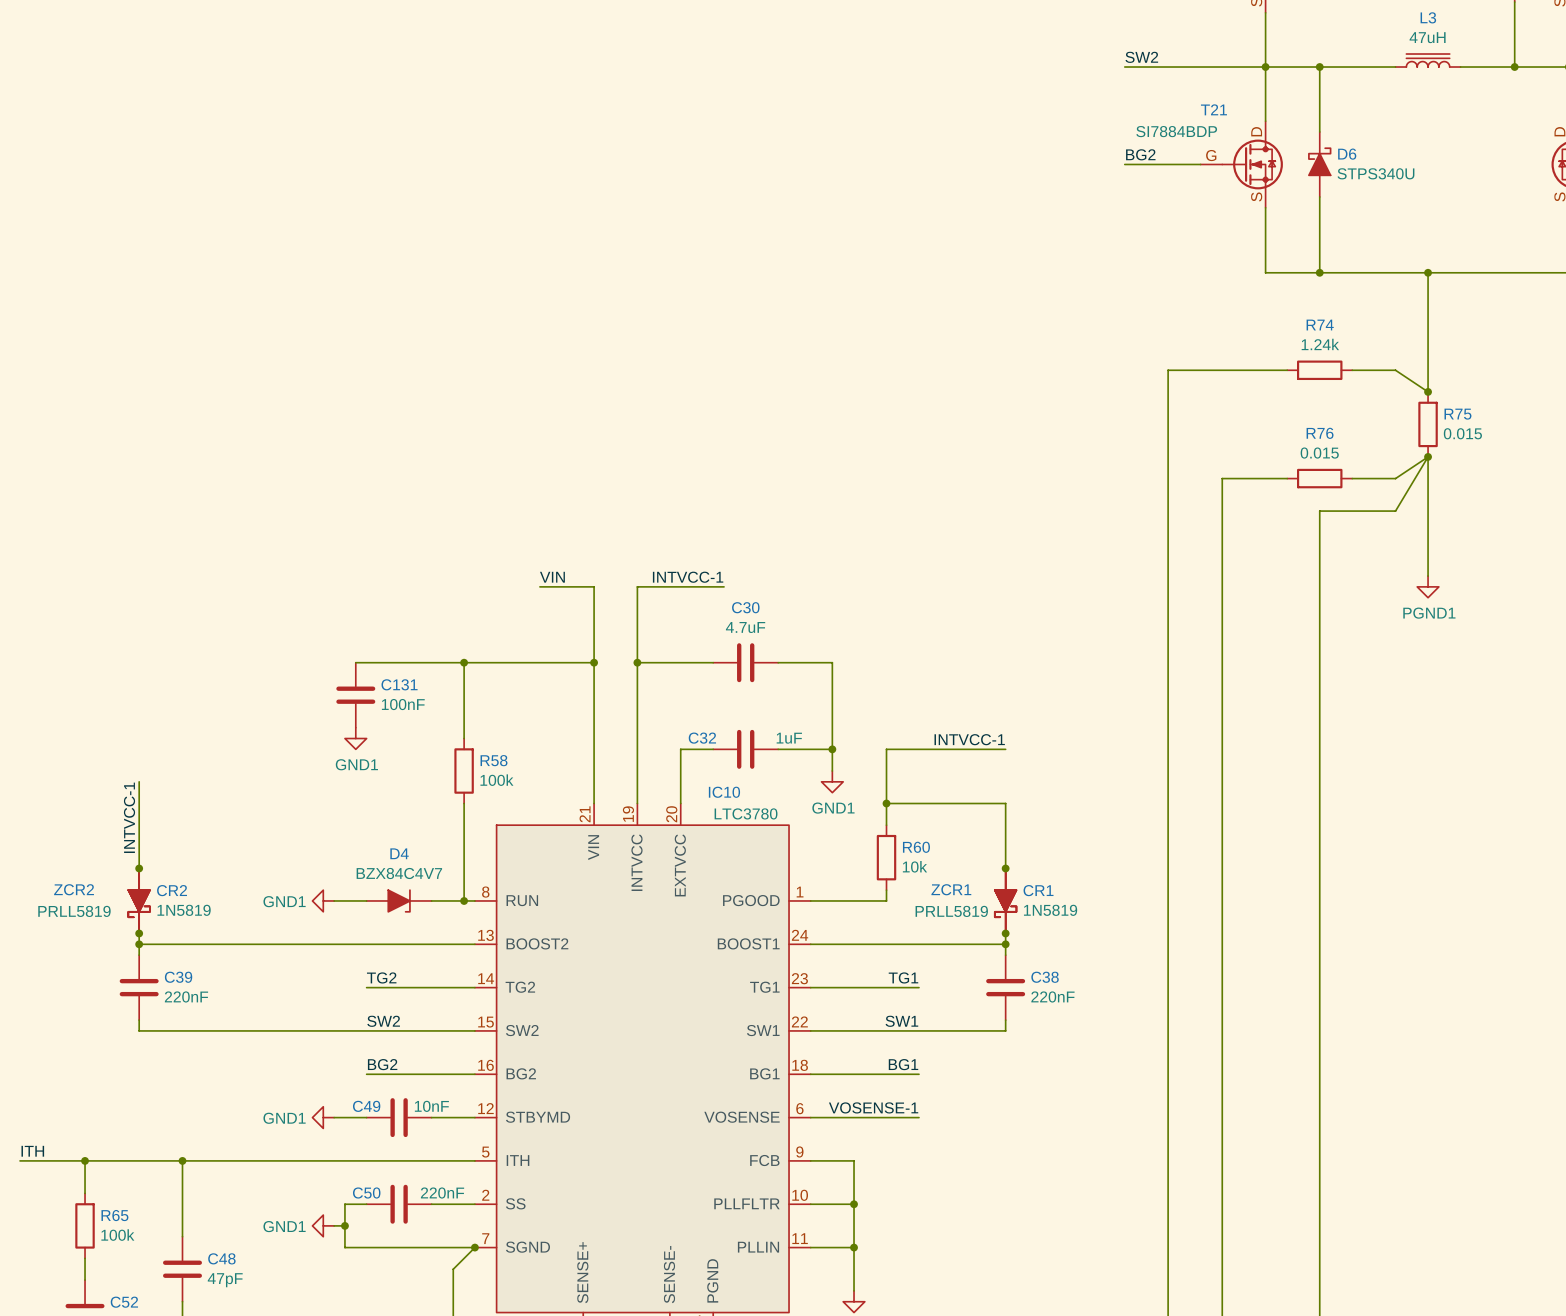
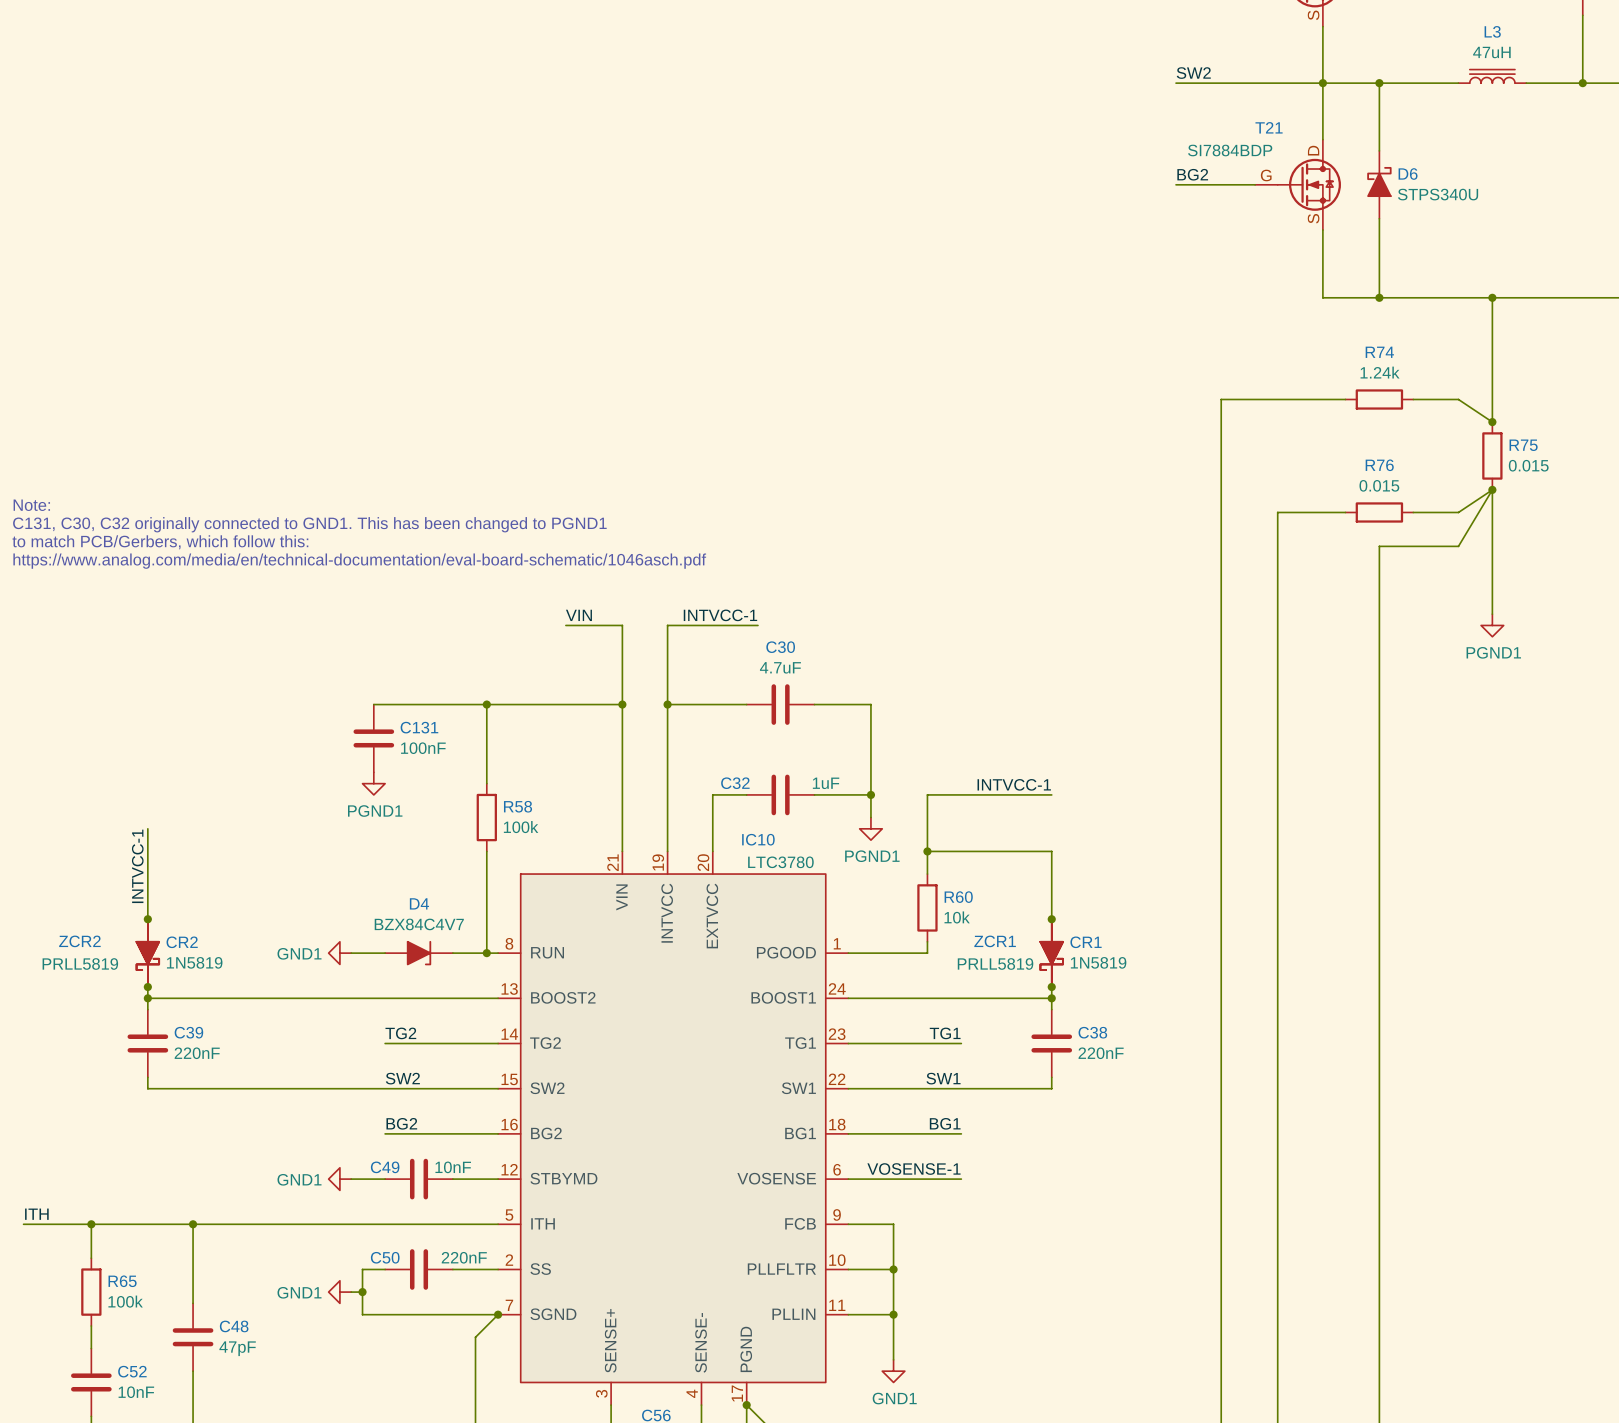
text: none -> Note: (31, 505)
text: none -> C131, C30, C32 originally connected to GND1. This has been changed to PGND1 (309, 524)
text: none -> to match PCB/Gerbers, which follow this: (160, 542)
text: none -> https://www.analog.com/media/en/technical-documentation/eval-board-schematic/1046asch.pdf (359, 561)
power symbol: GND1 (355, 738) -> PGND1 (373, 783)
power symbol: GND1 (832, 781) -> PGND1 (870, 828)

